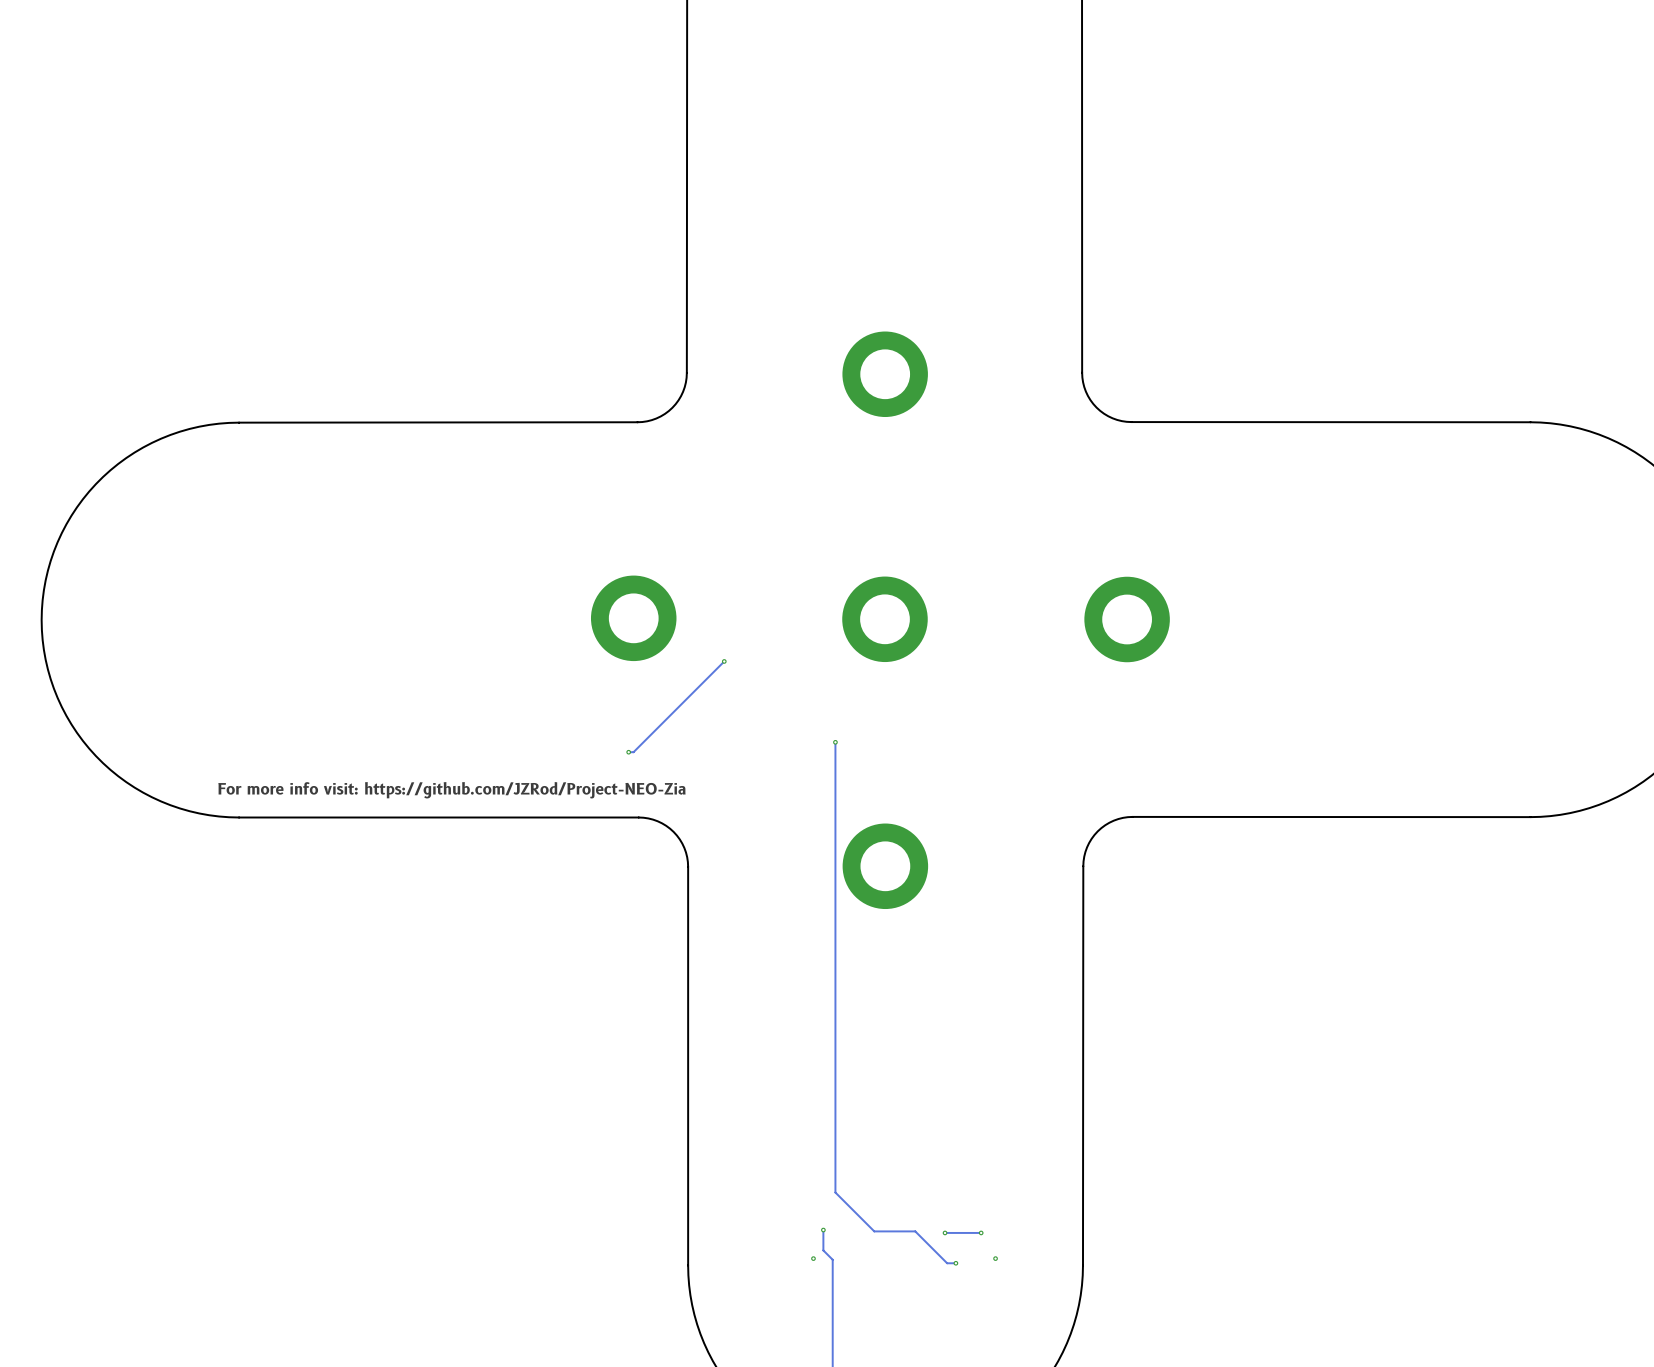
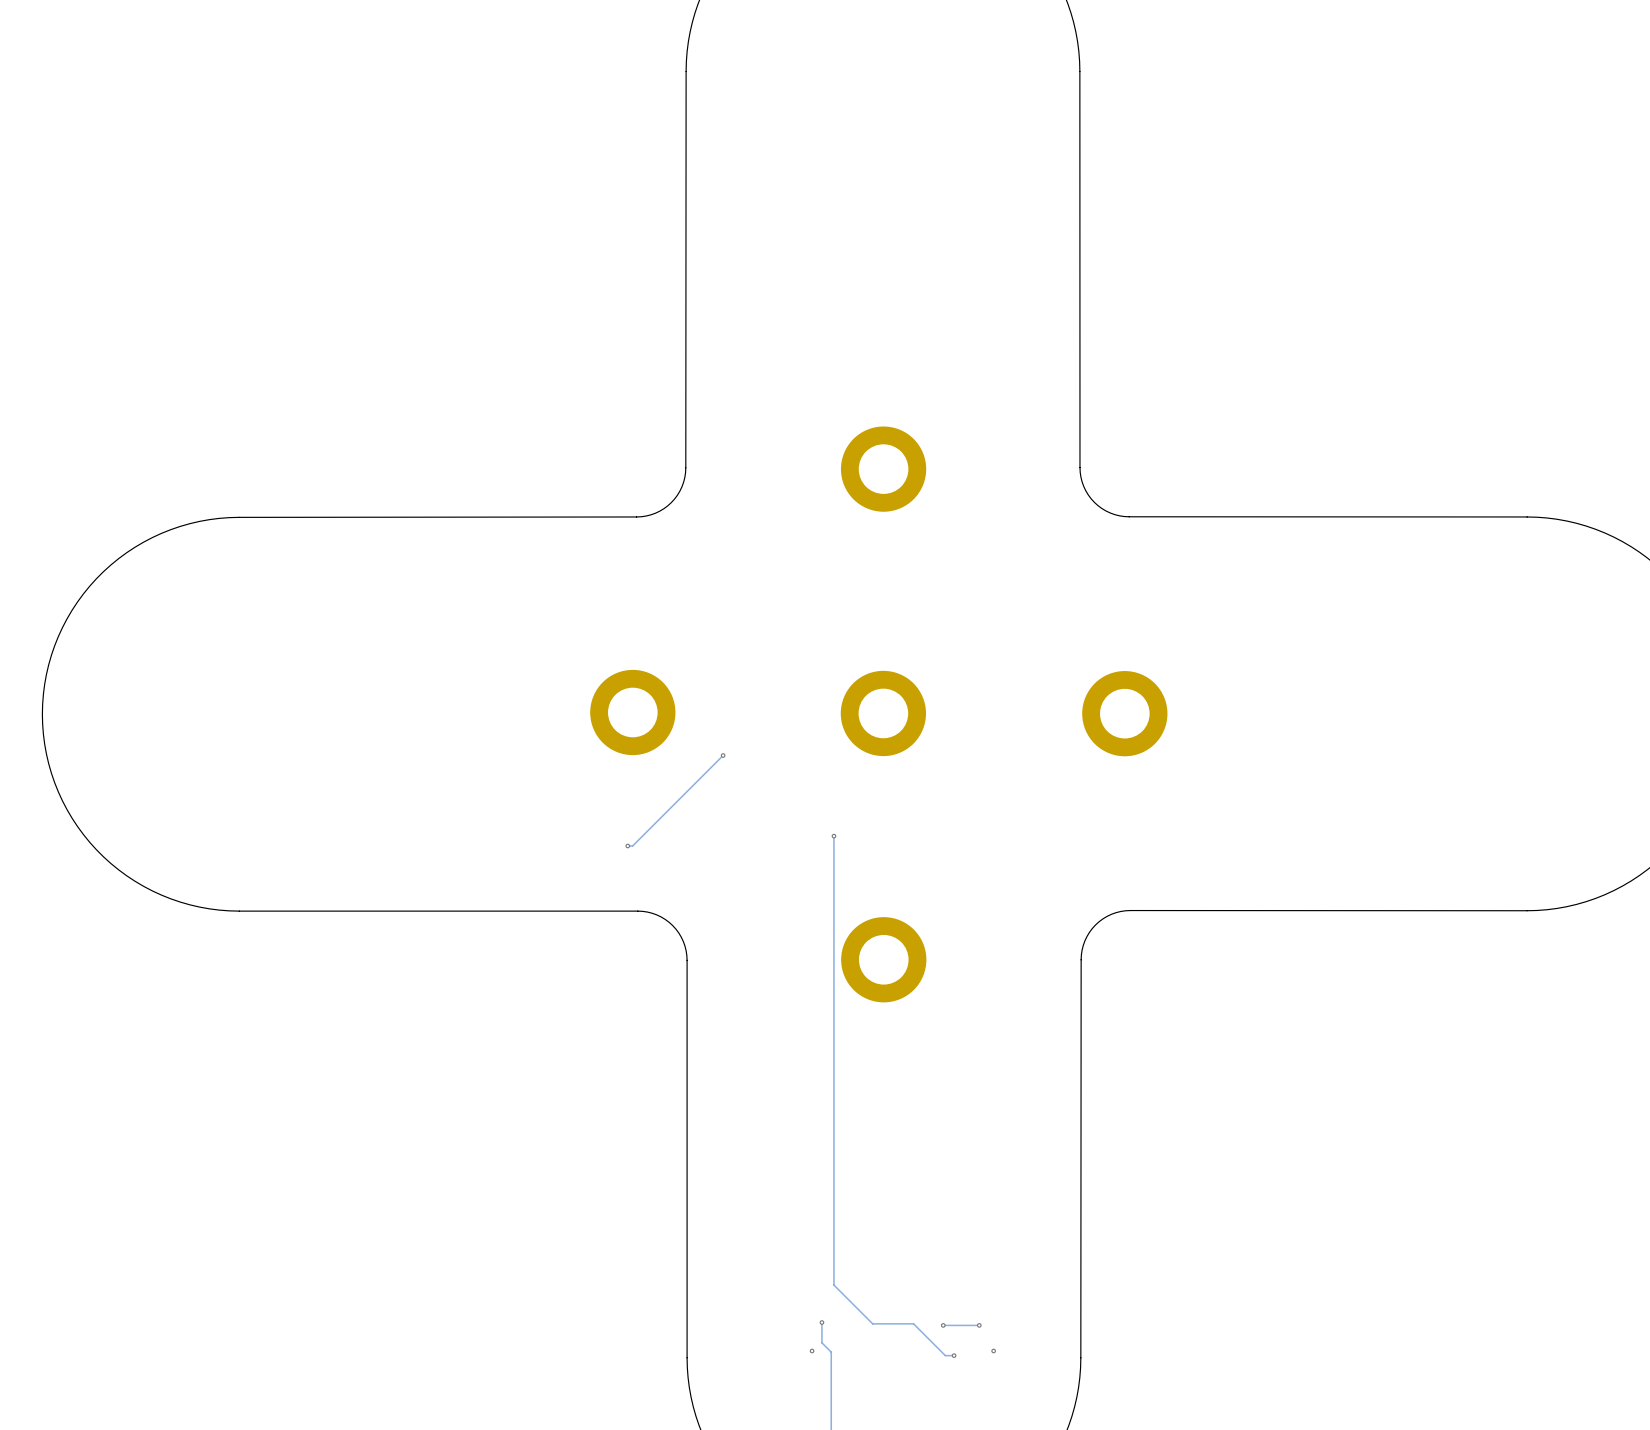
text: For more info visit: https://github.com/JZRod/Project-NEO-Zia (451, 790) -> none

